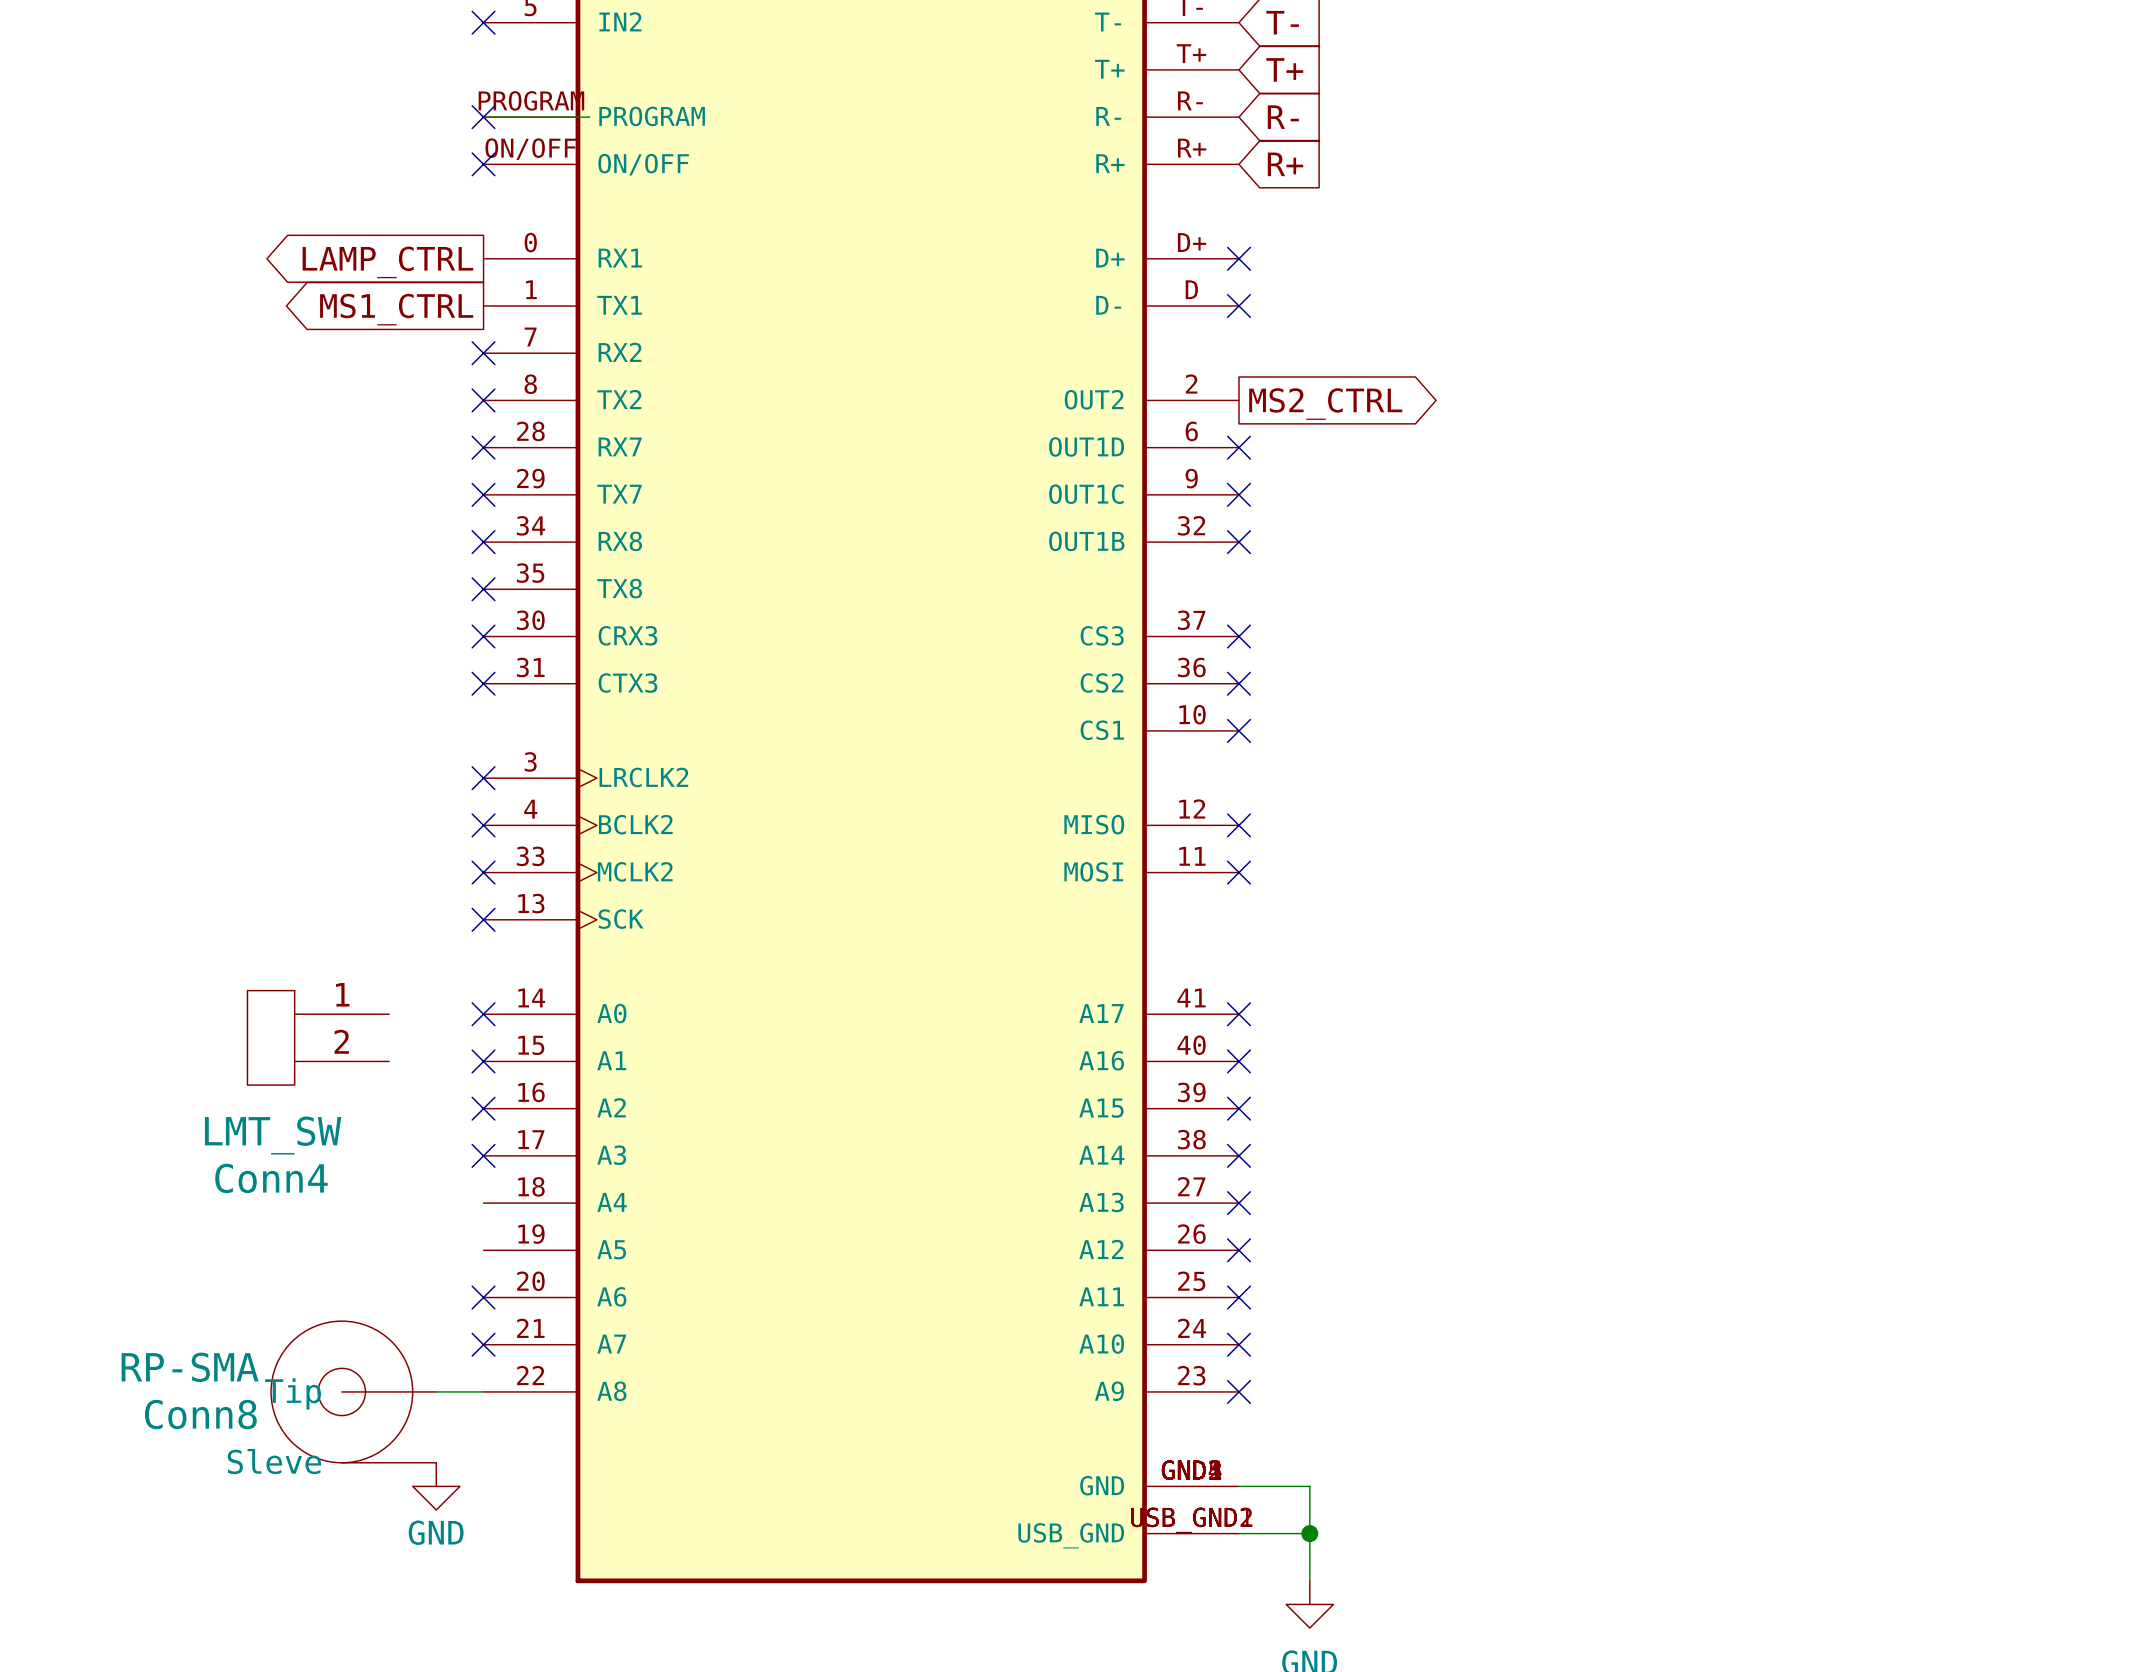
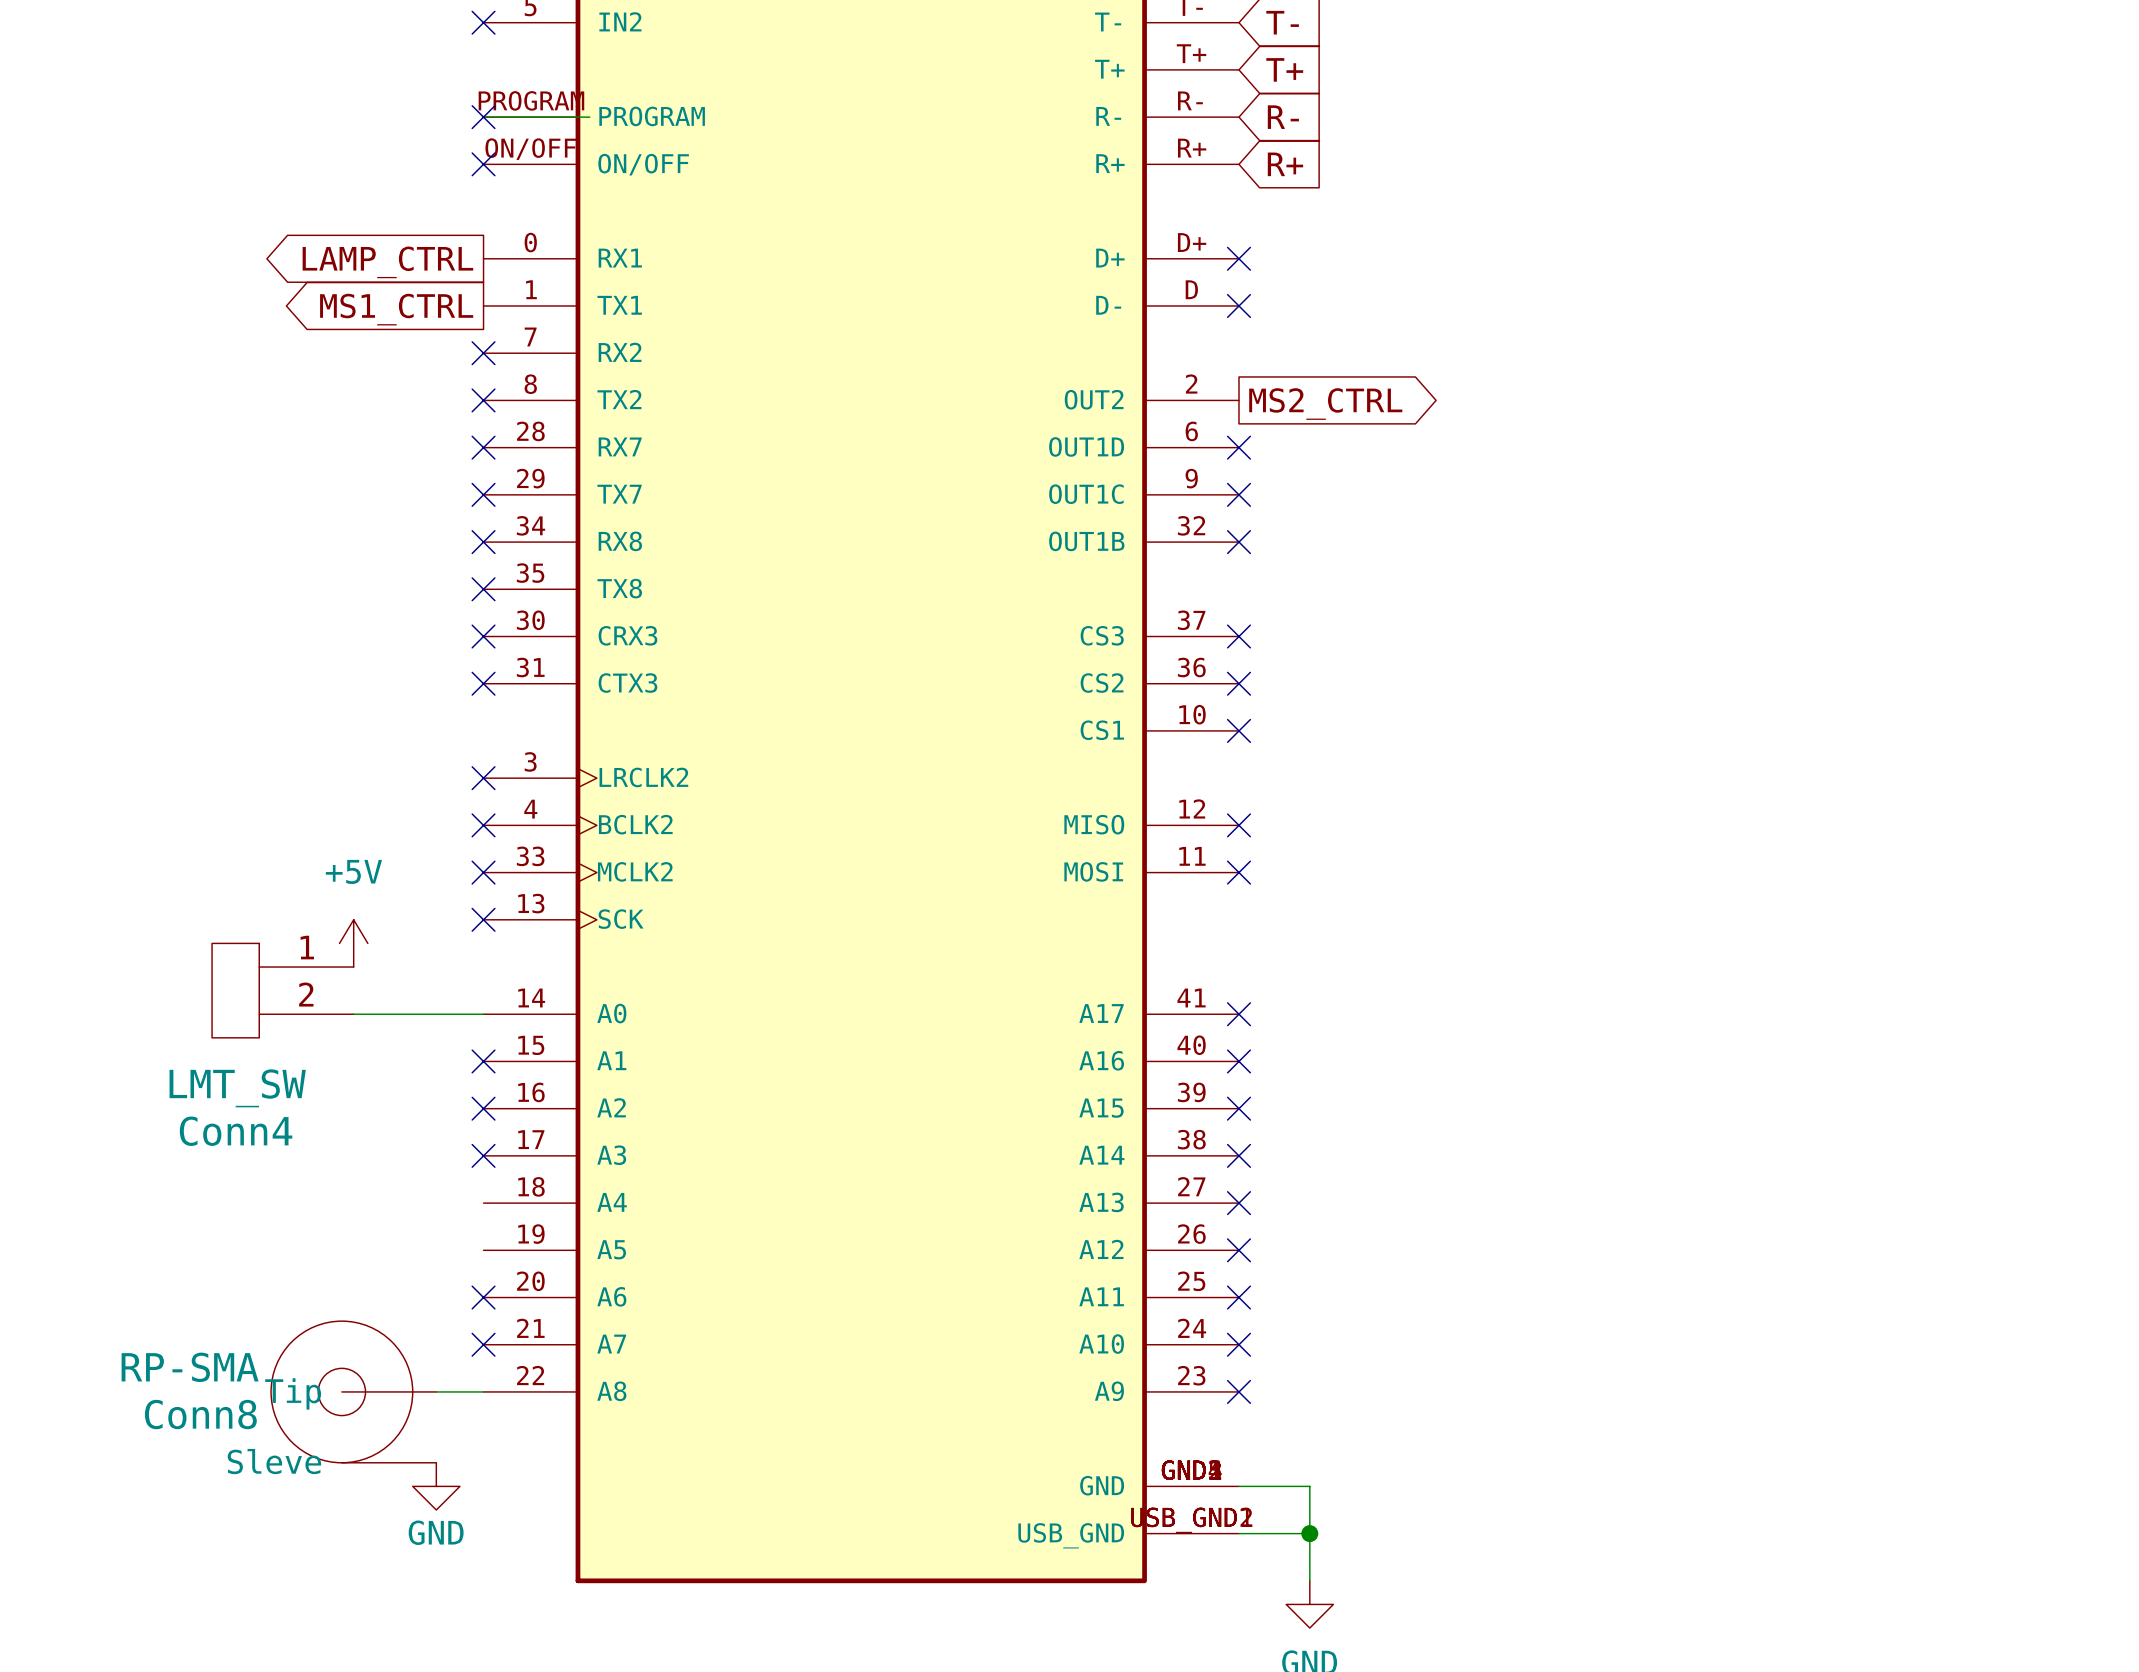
power symbol: none -> +5V (353, 943)
wire: none -> (353, 1014) (483, 1014)
no-connect mark: (483, 1014) -> none
Conn4 position: (318, 1037) -> (282, 990)

